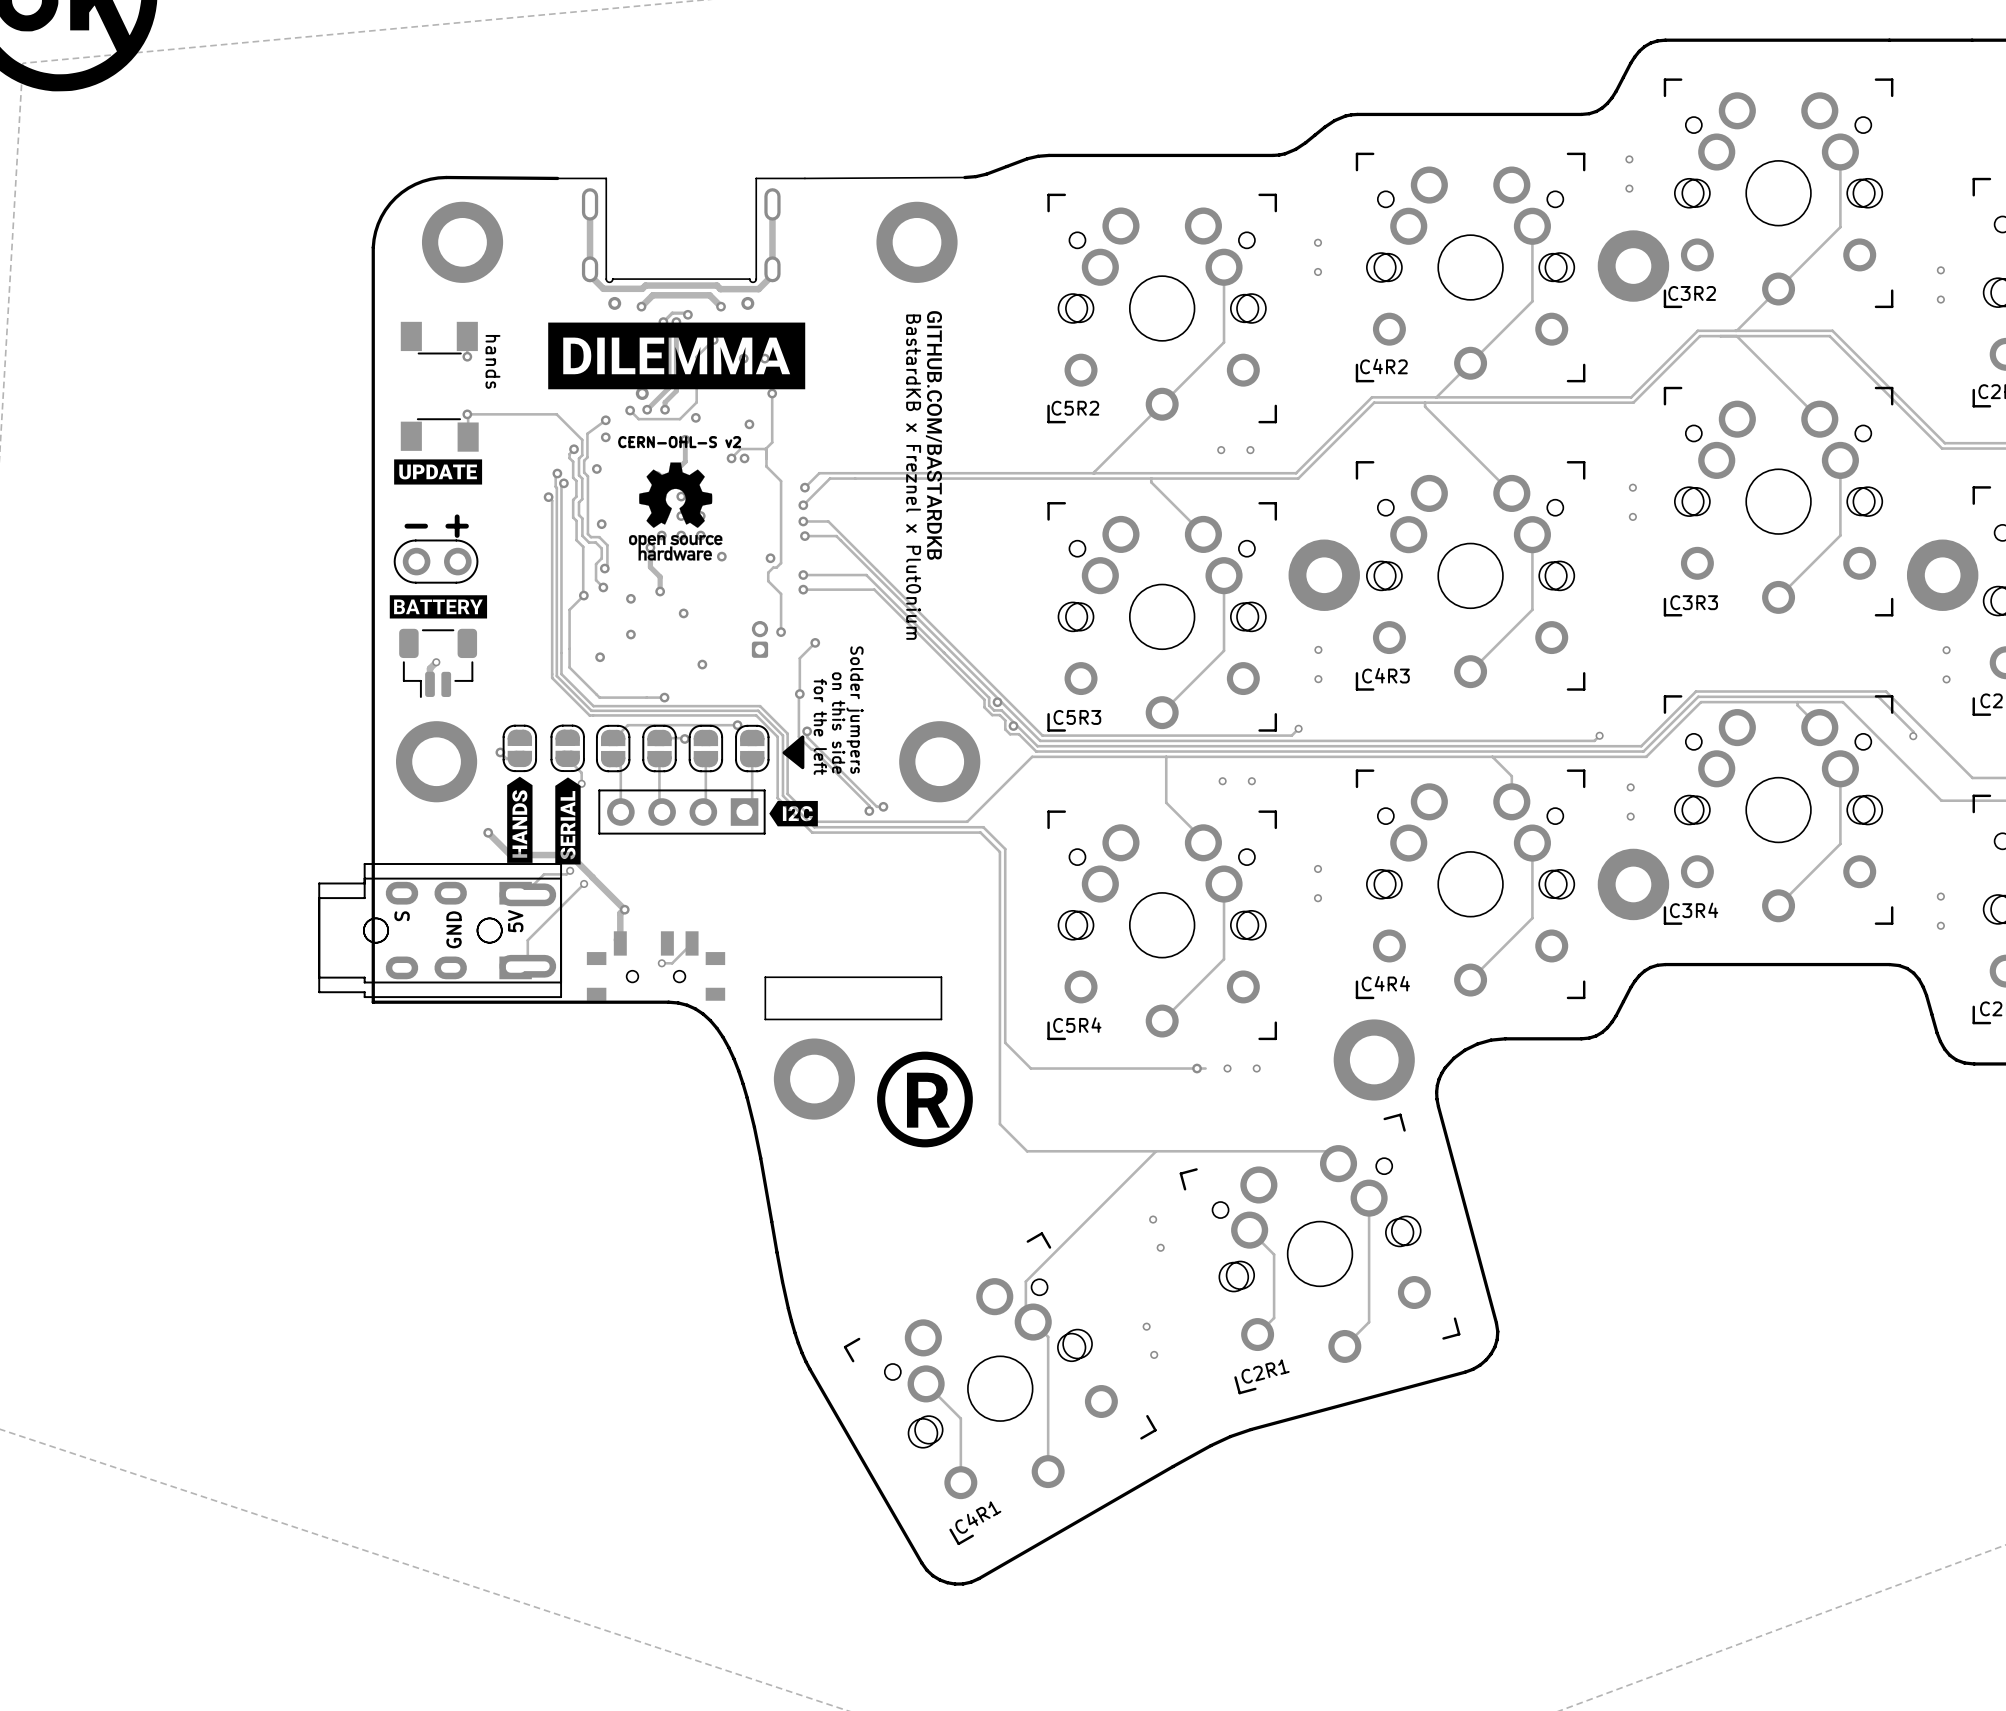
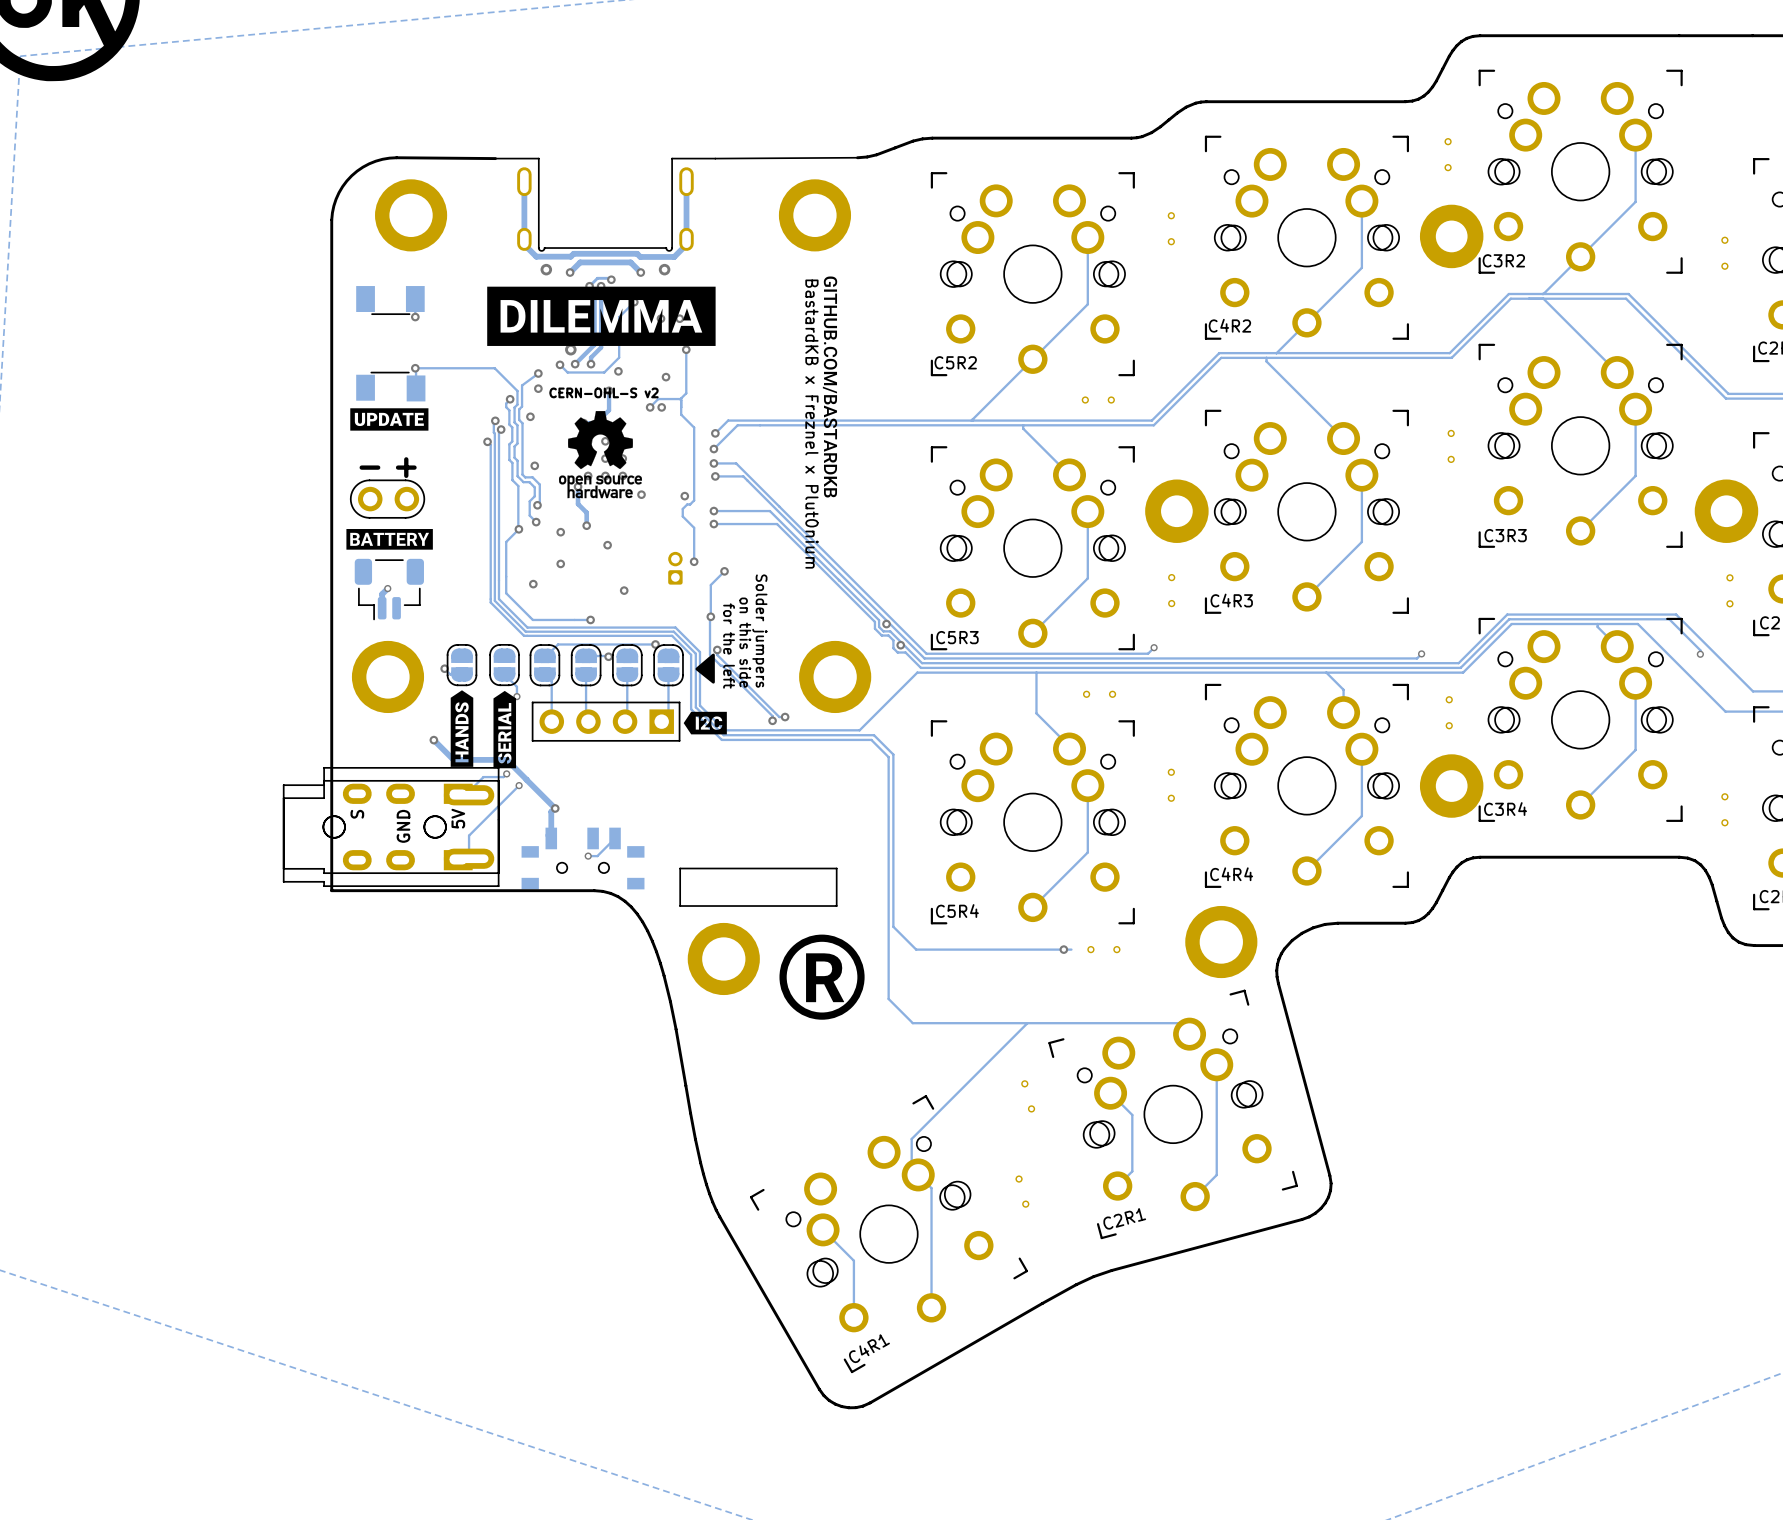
text: hands (492, 361) -> none

